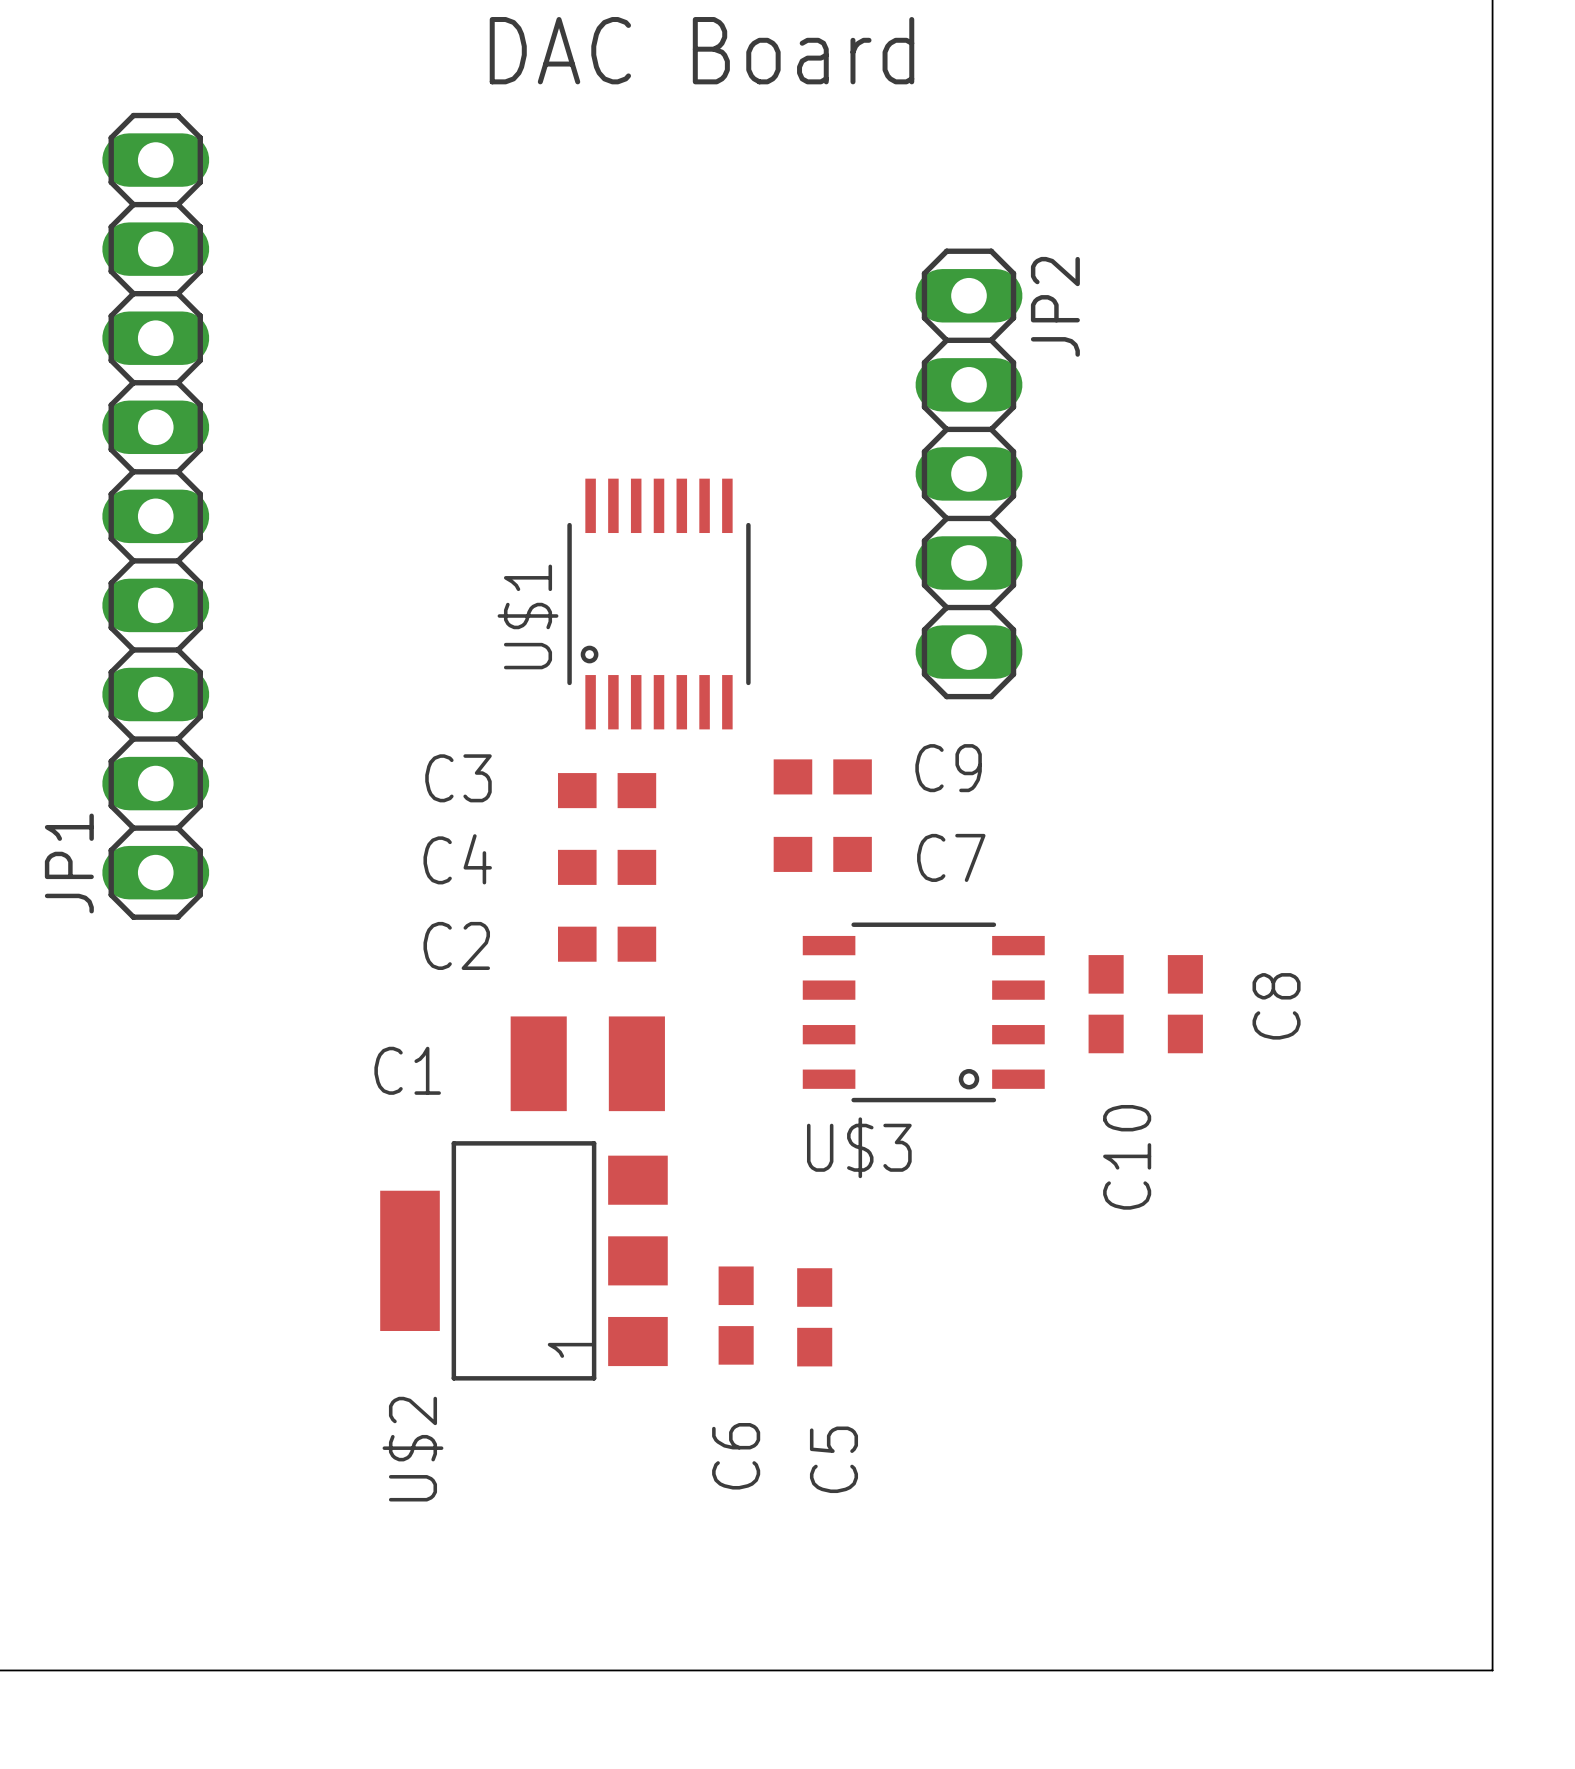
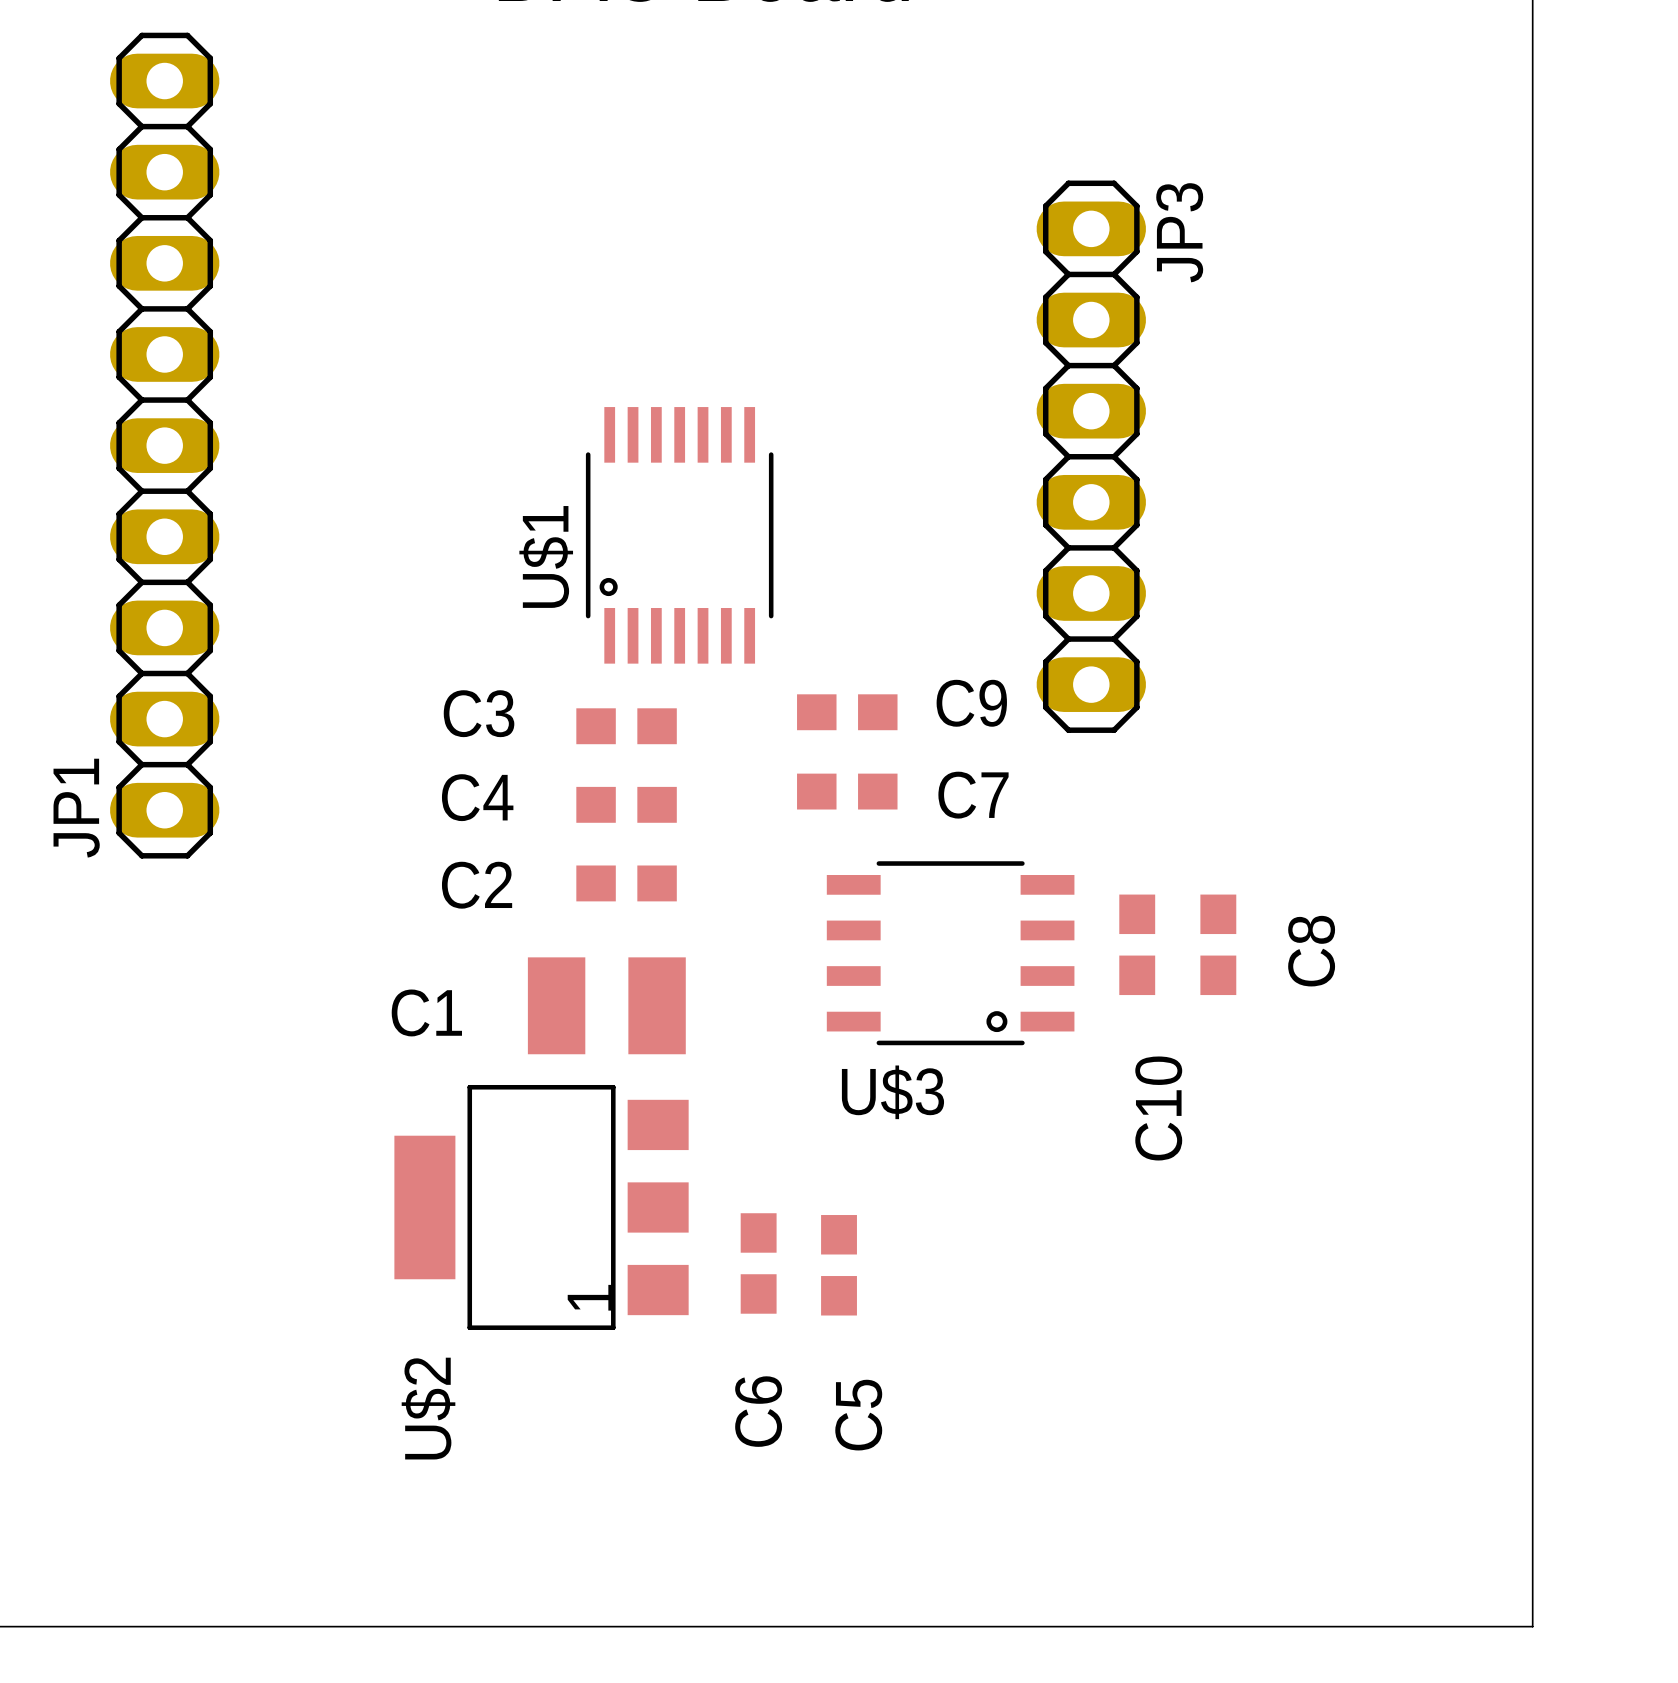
JP2: (968, 473) -> none
JP3: none -> (1091, 456)

